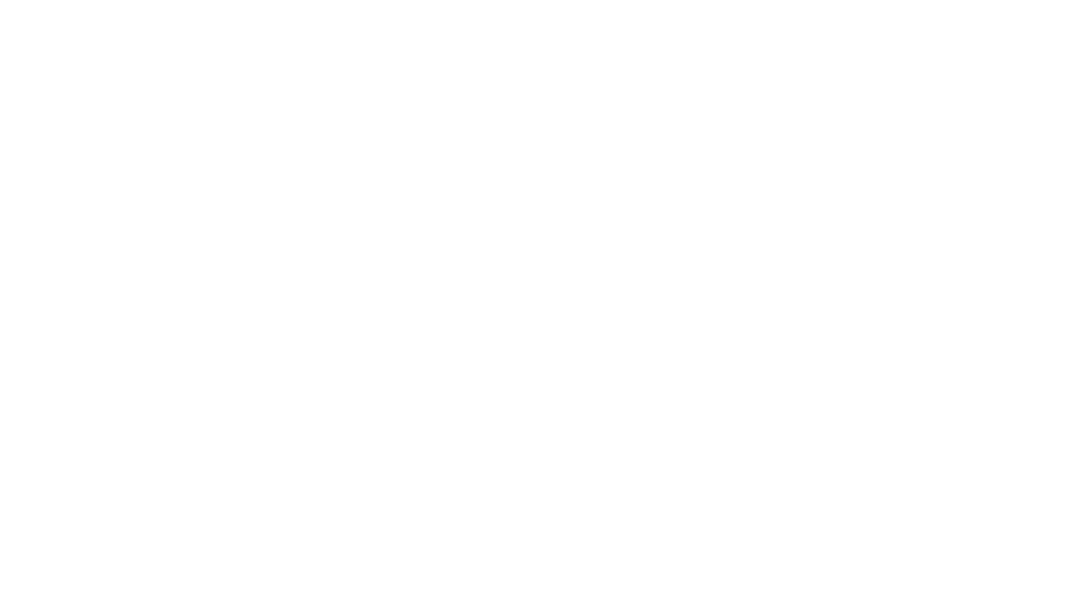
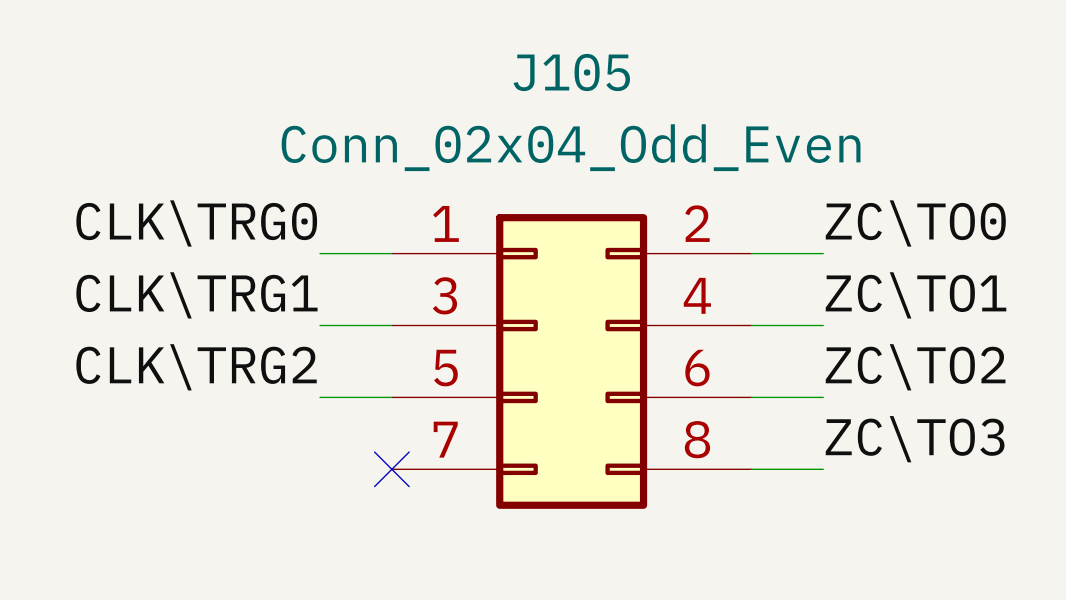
label: none -> CLK\TRG0 (196, 223)
label: none -> ZC\TO0 (915, 223)
wire: none -> (319, 253) (391, 253)
wire: none -> (751, 253) (823, 253)
label: none -> CLK\TRG1 (196, 295)
label: none -> ZC\TO1 (916, 295)
wire: none -> (319, 325) (391, 325)
wire: none -> (751, 325) (823, 325)
J105: none -> Conn_02x04_Odd_Even (571, 361)
label: none -> CLK\TRG2 (196, 367)
label: none -> ZC\TO2 (915, 367)
wire: none -> (319, 397) (391, 397)
wire: none -> (751, 397) (823, 397)
label: none -> ZC\TO3 (915, 439)
no-connect mark: none -> (391, 469)
wire: none -> (751, 469) (823, 469)

